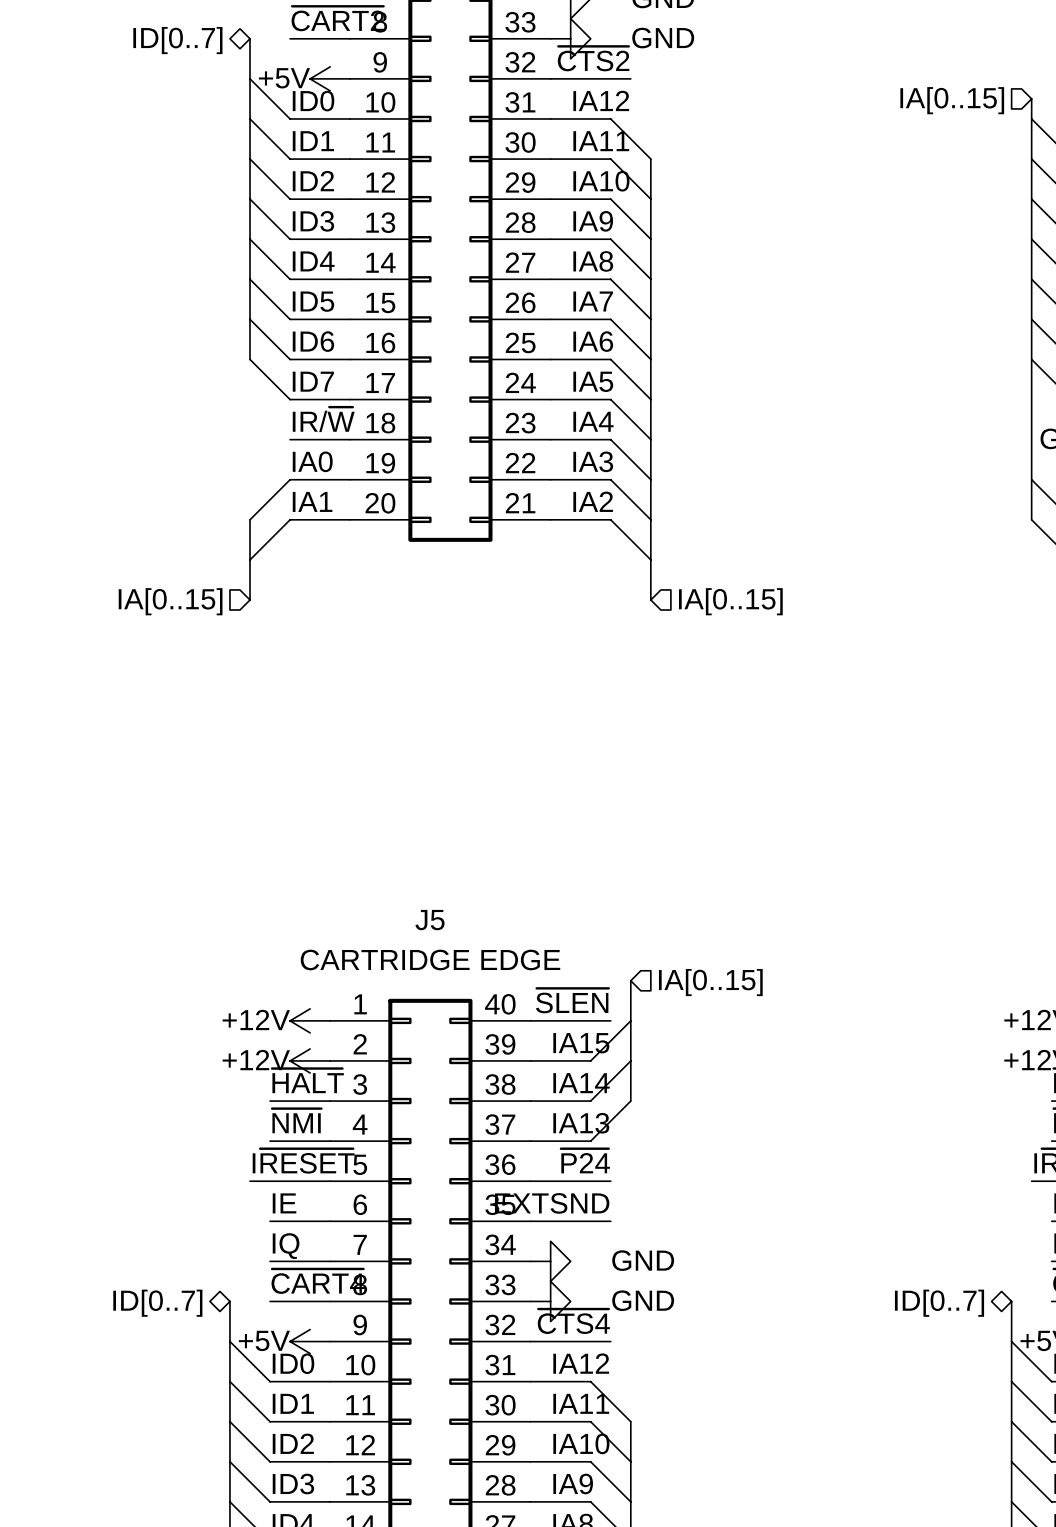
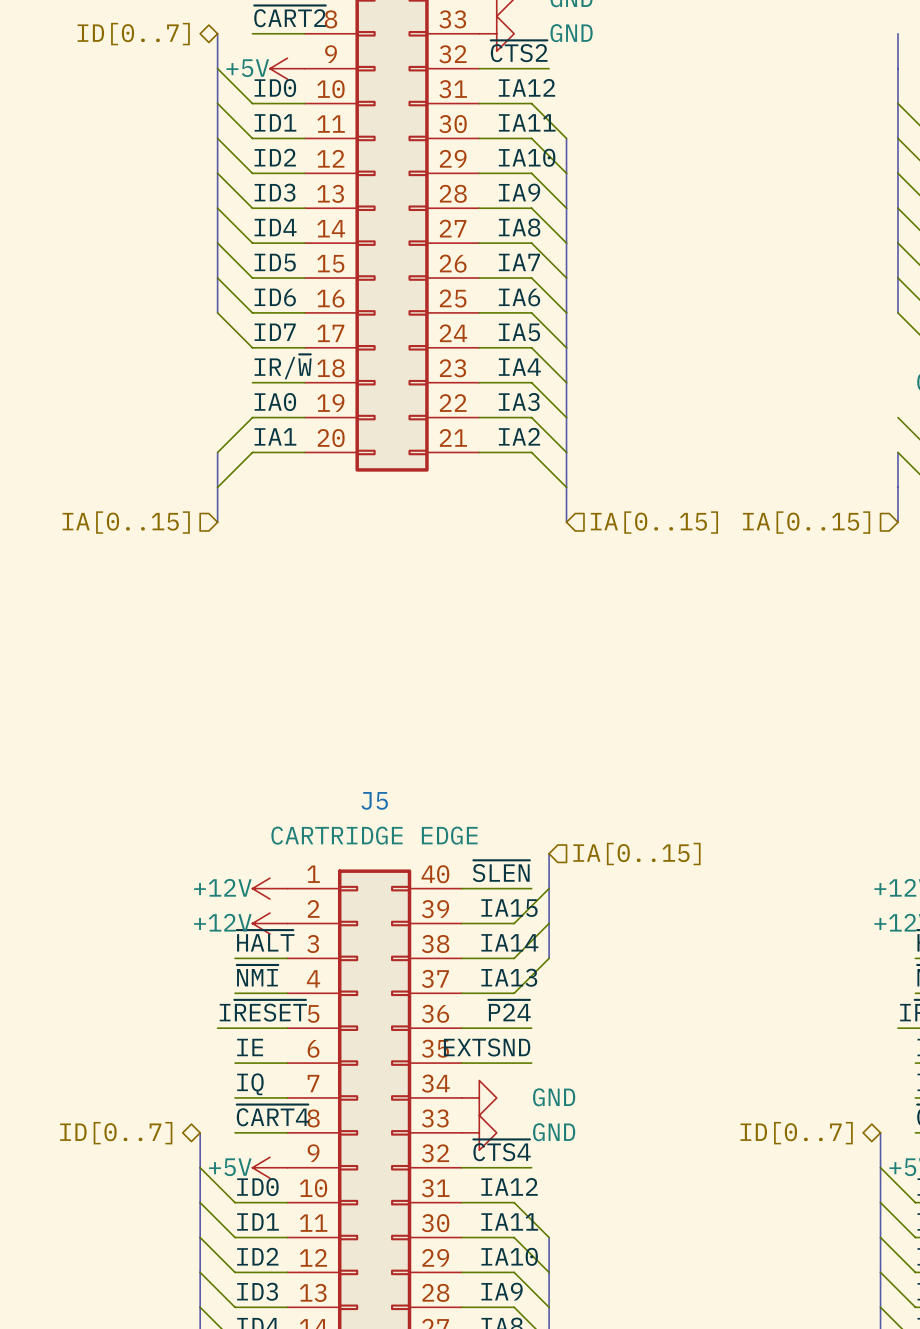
bus: none -> (897, 33) (897, 86)
hierarchical label: IA[0..15] (952, 100) -> none
bus: (1031, 359) (1031, 519) -> (897, 522) (897, 452)
hierarchical label: none -> IA[0..15] (806, 522)

